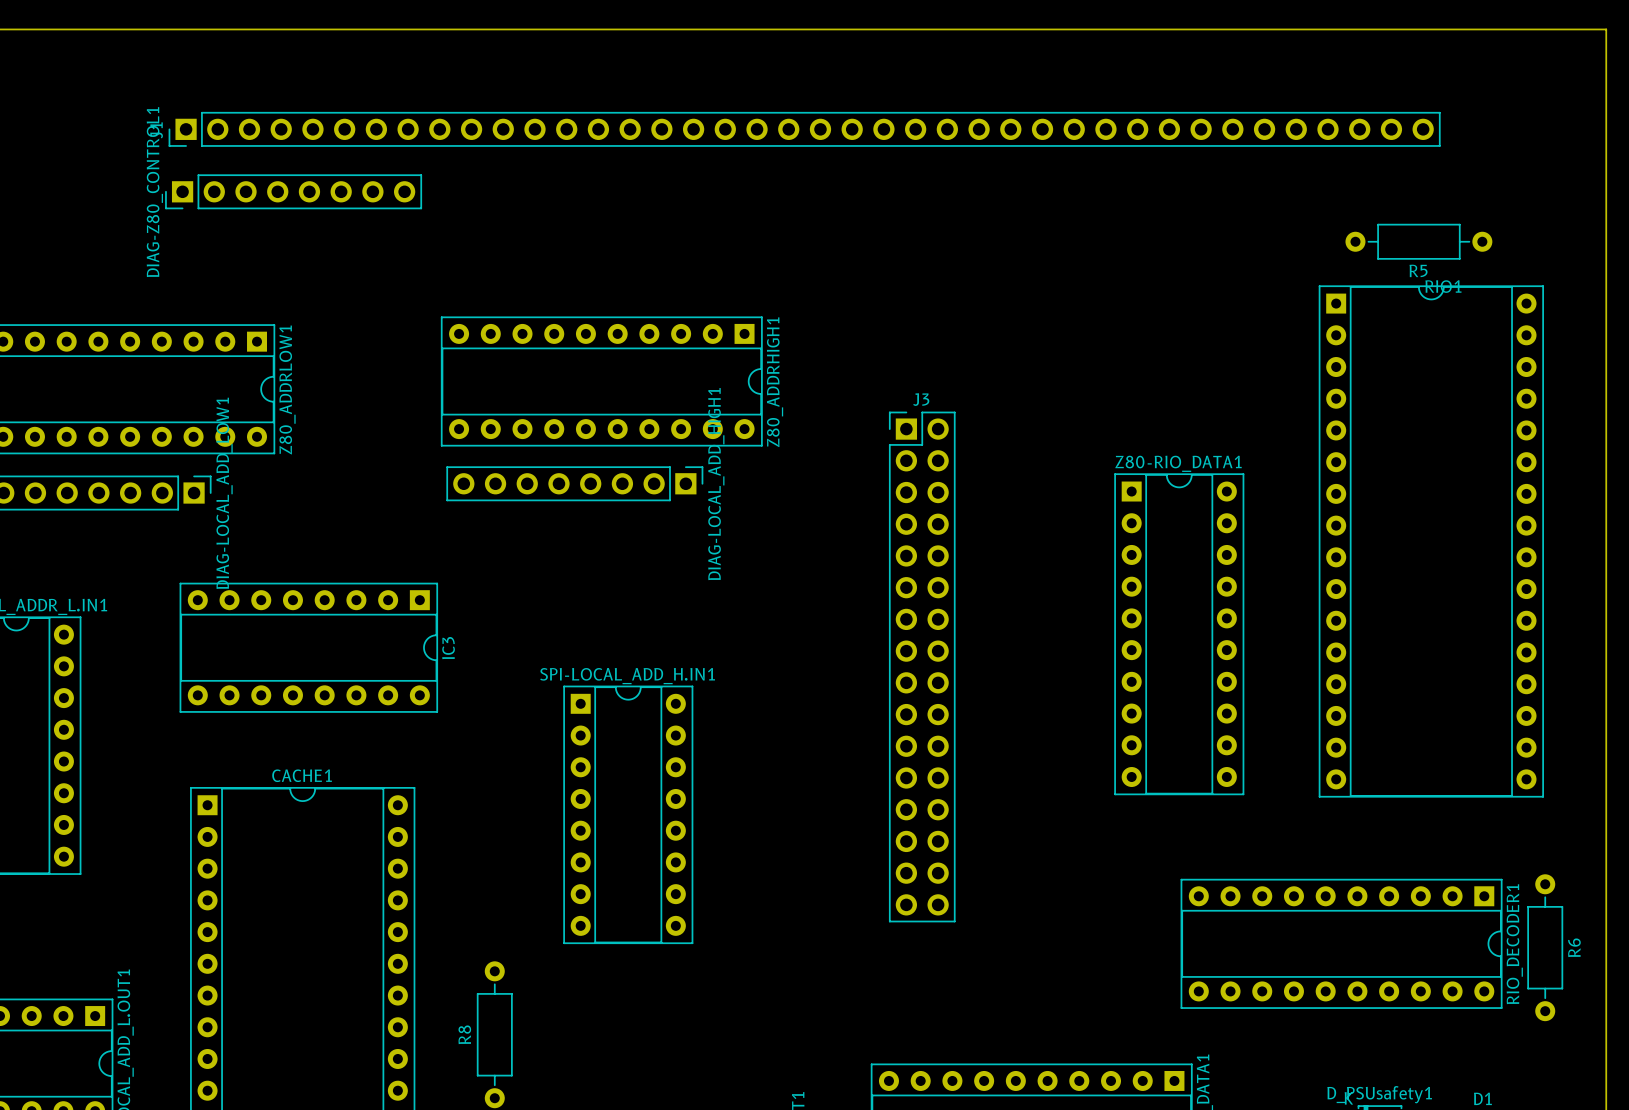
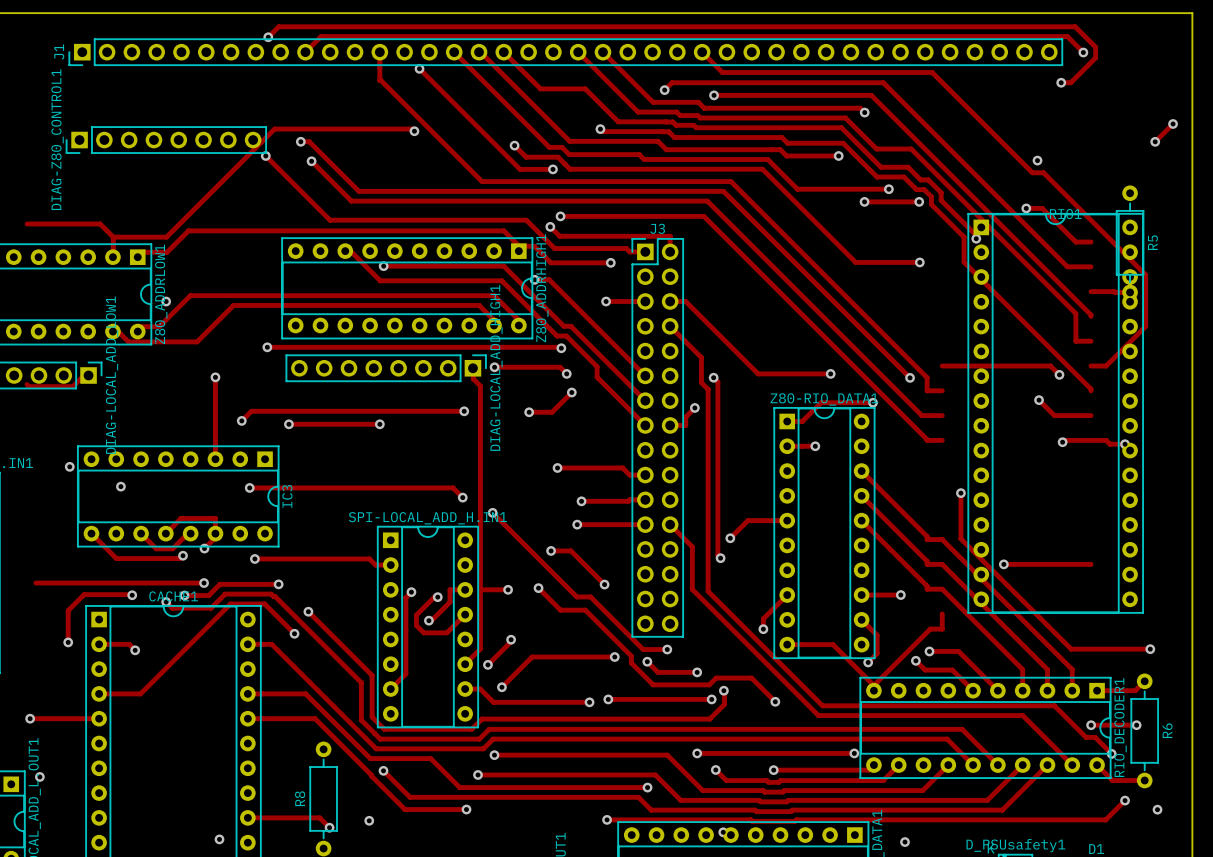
track: none -> (268, 37) (278, 26) (1075, 26) (1095, 47) (1095, 57) (1070, 82) (1061, 82)
via: none -> (268, 37)
track: none -> (305, 52) (321, 36) (1067, 36) (1083, 52)
track: none -> (379, 52) (379, 80) (482, 181) (731, 181) (927, 377) (927, 390) (942, 390)
track: none -> (454, 52) (549, 147) (562, 147) (569, 154) (639, 154) (644, 159) (767, 159) (797, 189) (888, 189)
track: none -> (479, 52) (569, 141) (658, 141) (666, 149) (780, 149) (786, 155) (838, 155)
track: none -> (503, 52) (540, 88) (585, 88) (618, 121) (672, 122) (676, 125) (693, 125) (696, 127) (841, 127) (881, 167) (908, 167) (920, 179) (928, 179) (941, 192) (941, 200) (976, 235) (976, 238)
track: none -> (578, 52) (638, 112) (676, 112) (680, 115) (697, 115) (700, 117) (845, 117) (876, 149) (911, 149) (1075, 313) (1075, 341) (1091, 341)
track: none -> (602, 52) (653, 102) (698, 102) (704, 108) (860, 108) (864, 112)
track: none -> (702, 52) (722, 72) (932, 72) (1032, 172) (1043, 172) (1145, 274) (1145, 326) (1106, 366) (1091, 366)
via: none -> (1083, 52)
track: none -> (419, 68) (520, 169) (552, 169)
via: none -> (419, 68)
via: none -> (1061, 82)
track: none -> (664, 90) (672, 82) (883, 82) (1067, 266) (1091, 266)
via: none -> (664, 90)
J1 position: (804, 129) -> (565, 52)
track: none -> (714, 95) (871, 95) (1091, 316)
via: none -> (714, 95)
via: none -> (864, 112)
track: none -> (1173, 123) (1155, 141)
via: none -> (1173, 123)
track: none -> (600, 129) (602, 131) (668, 131) (674, 137) (781, 137) (787, 143) (843, 143) (876, 177) (903, 177) (916, 189) (924, 189) (931, 196) (931, 204) (964, 237) (964, 262) (1091, 390)
via: none -> (600, 129)
track: none -> (414, 131) (412, 129) (274, 129) (166, 237) (113, 237)
via: none -> (414, 131)
track: none -> (300, 141) (309, 141) (358, 191) (723, 191) (910, 377)
via: none -> (300, 141)
via: none -> (1155, 141)
track: none -> (514, 145) (526, 157) (558, 157) (570, 169) (762, 169) (855, 262) (919, 262)
via: none -> (514, 145)
track: none -> (265, 155) (330, 220) (526, 220) (554, 248) (626, 248) (629, 251) (645, 251)
via: none -> (265, 155)
via: none -> (838, 155)
track: none -> (311, 161) (351, 201) (707, 201) (921, 415) (942, 415)
via: none -> (311, 161)
via: none -> (1037, 160)
via: none -> (552, 169)
R5 rotation: 0° (1418, 241) -> 90° clockwise (1130, 242)
R5 position: (1418, 241) -> (1130, 242)
via: none -> (888, 189)
track: none -> (864, 201) (919, 201)
via: none -> (864, 201)
via: none -> (919, 201)
R5 name position: R5 (1418, 270) -> R5 (1152, 242)
track: none -> (1026, 208) (1042, 208) (1075, 242) (1091, 242)
via: none -> (1026, 208)
track: none -> (560, 216) (703, 216) (927, 440) (942, 440)
via: none -> (560, 216)
track: none -> (27, 223) (100, 223) (113, 237)
track: none -> (550, 226) (559, 236) (670, 236) (670, 251)
via: none -> (550, 226)
track: none -> (113, 237) (113, 252)
via: none -> (976, 238)
track: none -> (345, 246) (380, 280) (501, 280) (557, 336) (566, 336) (597, 366) (597, 377) (645, 425)
track: none -> (138, 252) (167, 252) (188, 230) (503, 230) (519, 246) (534, 246) (550, 262) (610, 262)
via: none -> (610, 262)
via: none -> (919, 262)
track: none -> (383, 266) (503, 266) (563, 326) (570, 326) (645, 400)
via: none -> (383, 266)
track: none -> (534, 279) (549, 279) (645, 375)
via: none -> (534, 279)
track: none -> (1091, 291) (1130, 292)
via: none -> (166, 301)
track: none -> (606, 301) (645, 301)
via: none -> (606, 301)
track: none -> (670, 301) (685, 301) (758, 373) (830, 373)
track: none -> (494, 320) (479, 305) (233, 305) (197, 341) (128, 341) (113, 326)
track: none -> (519, 320) (494, 295) (190, 295) (159, 326) (138, 326)
track: none -> (670, 326) (701, 357) (701, 382) (708, 389) (708, 591) (822, 705) (1054, 705) (1086, 737) (1095, 737) (1111, 753)
track: none -> (267, 347) (561, 348)
via: none -> (267, 347)
via: none -> (561, 348)
track: none -> (473, 363) (473, 379) (480, 386) (480, 648) (465, 664)
track: none -> (942, 366) (1050, 366) (1059, 374)
track: none -> (494, 367) (560, 367) (566, 373)
via: none -> (494, 367)
track: none -> (88, 370) (72, 386) (29, 386) (26, 384)
via: none -> (566, 373)
via: none -> (830, 373)
via: none -> (1059, 374)
track: none -> (215, 377) (215, 459)
via: none -> (215, 377)
track: none -> (713, 377) (717, 381) (717, 555) (720, 558)
via: none -> (713, 377)
via: none -> (910, 377)
track: none -> (571, 392) (552, 412) (529, 412)
via: none -> (571, 392)
track: none -> (1039, 400) (1054, 415) (1091, 415)
via: none -> (1039, 400)
track: none -> (873, 402) (821, 402) (802, 421) (787, 421)
via: none -> (873, 402)
track: none -> (694, 407) (685, 417) (685, 425) (670, 425)
via: none -> (694, 407)
track: none -> (464, 411) (251, 411) (241, 420)
via: none -> (464, 411)
via: none -> (529, 412)
via: none -> (241, 420)
track: none -> (288, 424) (379, 424)
via: none -> (288, 424)
via: none -> (379, 424)
track: none -> (1062, 442) (1064, 440) (1106, 440) (1109, 444) (1125, 444)
via: none -> (1062, 442)
via: none -> (1125, 444)
track: none -> (787, 446) (815, 446)
via: none -> (815, 446)
via: none -> (69, 466)
track: none -> (557, 467) (622, 467) (629, 475) (645, 475)
via: none -> (557, 467)
track: none -> (861, 471) (927, 536) (927, 539) (942, 539) (1072, 669) (1072, 690)
Z80-RIO_DATA1 position: (1179, 634) -> (824, 533)
via: none -> (120, 486)
track: none -> (249, 487) (453, 487) (462, 497)
via: none -> (249, 487)
track: none -> (960, 493) (960, 538) (1071, 649) (1150, 649)
via: none -> (960, 493)
track: none -> (861, 495) (927, 561) (927, 564) (942, 564) (1047, 669) (1047, 690)
via: none -> (462, 497)
track: none -> (645, 499) (581, 501)
via: none -> (581, 501)
J3 position: (922, 666) -> (657, 437)
track: none -> (492, 512) (576, 596) (590, 596) (643, 649) (667, 649)
via: none -> (492, 512)
track: none -> (787, 520) (747, 520) (730, 538)
track: none -> (861, 520) (927, 586) (927, 589) (942, 589) (1022, 669) (1022, 690)
track: none -> (577, 524) (645, 524)
via: none -> (577, 524)
track: none -> (670, 524) (692, 546) (692, 589) (818, 715) (1022, 715) (1072, 765)
track: none -> (91, 533) (116, 558) (180, 558) (183, 555)
track: none -> (141, 533) (156, 548) (172, 548) (187, 533) (190, 533)
track: none -> (165, 533) (181, 518) (215, 518) (215, 537) (204, 548)
via: none -> (730, 538)
via: none -> (204, 548)
track: none -> (551, 550) (570, 550) (604, 584)
via: none -> (551, 550)
via: none -> (183, 555)
via: none -> (720, 558)
track: none -> (254, 558) (369, 558) (375, 565) (390, 565)
via: none -> (254, 558)
track: none -> (1003, 564) (1091, 564)
via: none -> (1003, 564)
track: none -> (35, 583) (204, 583)
via: none -> (204, 583)
track: none -> (278, 584) (220, 584) (208, 595) (184, 595)
via: none -> (278, 584)
via: none -> (604, 584)
track: none -> (538, 588) (560, 610) (585, 610) (631, 656) (631, 663) (653, 684) (709, 684) (716, 678) (751, 678) (775, 701)
via: none -> (538, 588)
track: none -> (465, 589) (450, 589) (450, 602) (431, 620) (428, 620)
track: none -> (480, 589) (508, 589)
via: none -> (508, 589)
track: none -> (411, 592) (405, 597) (405, 673) (390, 689)
via: none -> (411, 592)
track: none -> (787, 595) (763, 618) (763, 629)
track: none -> (861, 595) (900, 595)
via: none -> (900, 595)
track: none -> (132, 595) (84, 594) (68, 610) (68, 642)
via: none -> (132, 595)
via: none -> (184, 595)
track: none -> (437, 597) (434, 597) (416, 615) (416, 625) (423, 632) (446, 632) (465, 614)
via: none -> (437, 597)
track: none -> (166, 602) (172, 608) (211, 608) (225, 594) (271, 594) (275, 596) (361, 682) (361, 720) (380, 739) (479, 739) (489, 729) (962, 729) (997, 765)
via: none -> (166, 602)
track: none -> (308, 611) (372, 675) (372, 717) (384, 729) (471, 729) (482, 719) (709, 719) (724, 704) (723, 690)
via: none -> (308, 611)
track: none -> (942, 613) (942, 629) (930, 629) (873, 685)
track: none -> (861, 619) (877, 635) (877, 653) (868, 662)
via: none -> (428, 620)
via: none -> (763, 629)
track: none -> (294, 633) (264, 603) (230, 603) (140, 693) (99, 693)
via: none -> (294, 633)
track: none -> (511, 639) (487, 664)
via: none -> (511, 639)
via: none -> (68, 642)
track: none -> (99, 644) (129, 644) (135, 650)
track: none -> (247, 644) (271, 644) (376, 748) (483, 748) (493, 739) (947, 739) (973, 765)
track: none -> (787, 644) (833, 644) (873, 685)
via: none -> (667, 649)
via: none -> (1150, 649)
via: none -> (135, 650)
track: none -> (929, 651) (958, 651) (997, 690)
via: none -> (929, 651)
track: none -> (614, 657) (532, 657) (501, 687)
via: none -> (614, 657)
track: none -> (915, 660) (925, 670) (952, 670) (973, 690)
via: none -> (915, 660)
track: none -> (647, 661) (657, 672) (697, 672)
via: none -> (647, 661)
via: none -> (868, 662)
via: none -> (487, 664)
via: none -> (697, 672)
track: none -> (1144, 681) (1135, 690) (1097, 690)
via: none -> (501, 687)
track: none -> (465, 689) (480, 689) (493, 702) (589, 702)
via: none -> (723, 690)
track: none -> (247, 693) (305, 693) (370, 758) (430, 758) (459, 787) (647, 787)
track: none -> (608, 699) (711, 699)
via: none -> (608, 699)
via: none -> (711, 699)
via: none -> (775, 701)
via: none -> (589, 702)
track: none -> (30, 718) (99, 718)
via: none -> (30, 718)
track: none -> (247, 718) (315, 718) (404, 809) (466, 809)
track: none -> (1091, 725) (1136, 725)
via: none -> (1091, 725)
via: none -> (1136, 725)
track: none -> (697, 753) (854, 753)
via: none -> (697, 753)
via: none -> (854, 753)
via: none -> (1111, 753)
track: none -> (494, 755) (667, 755) (702, 790) (764, 792) (922, 790) (948, 765)
via: none -> (494, 755)
track: none -> (873, 765) (868, 770) (773, 770)
track: none -> (898, 765) (883, 780) (780, 780) (778, 782) (726, 780) (715, 769)
track: none -> (1022, 765) (987, 800) (788, 800) (786, 801) (680, 800) (655, 774) (477, 774)
track: none -> (1047, 765) (1002, 810) (792, 810) (790, 811) (651, 810) (638, 797) (410, 797) (383, 770)
track: none -> (1097, 765) (1112, 780) (1144, 780)
via: none -> (715, 769)
via: none -> (773, 770)
via: none -> (383, 770)
via: none -> (477, 774)
via: none -> (39, 776)
via: none -> (647, 787)
track: none -> (1125, 800) (1105, 819) (796, 819) (794, 821) (607, 819)
via: none -> (1125, 800)
via: none -> (466, 809)
via: none -> (1157, 809)
track: none -> (247, 817) (319, 817) (329, 827)
via: none -> (607, 819)
via: none -> (369, 820)
via: none -> (329, 827)
via: none -> (723, 832)
via: none -> (219, 839)
via: none -> (904, 842)

